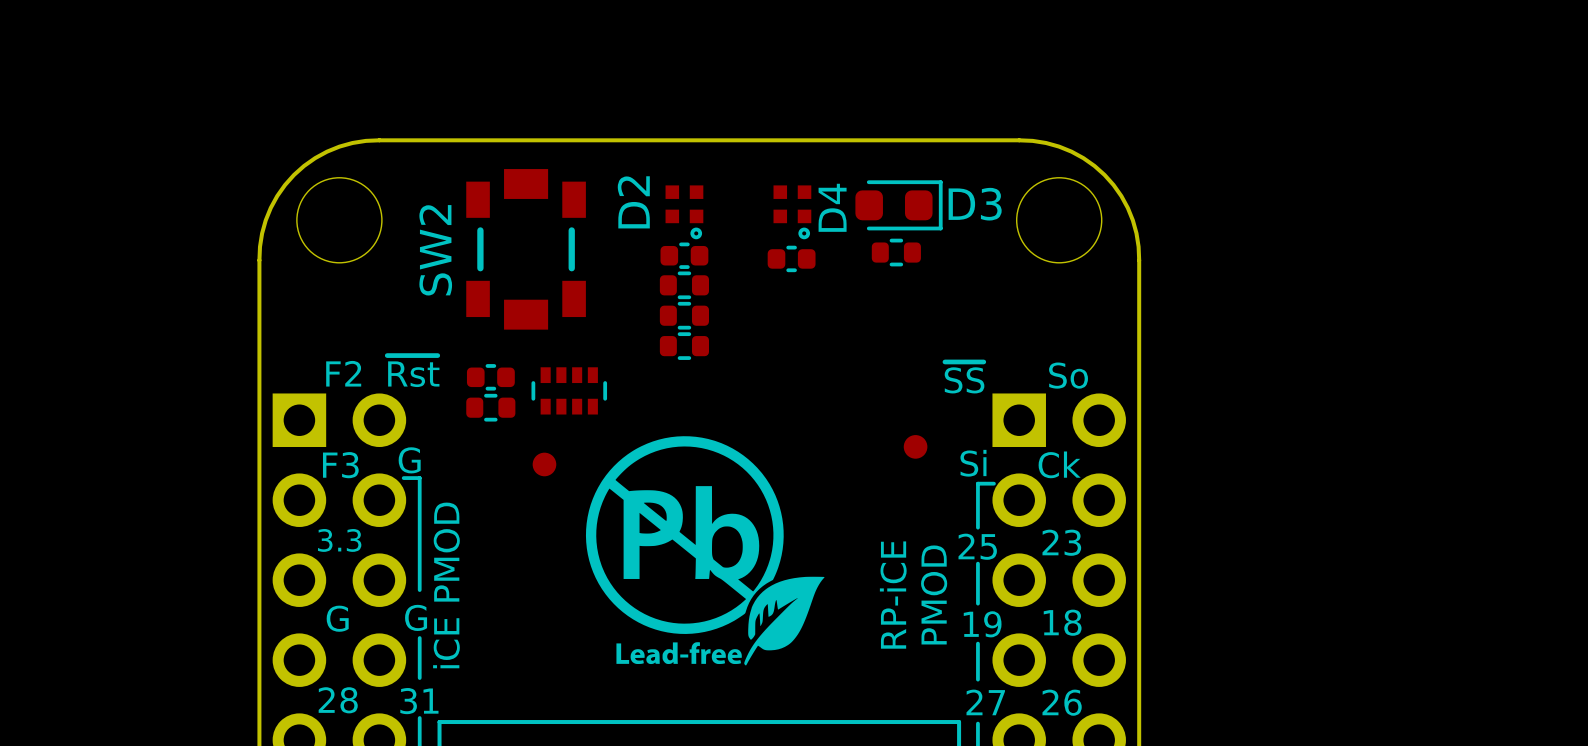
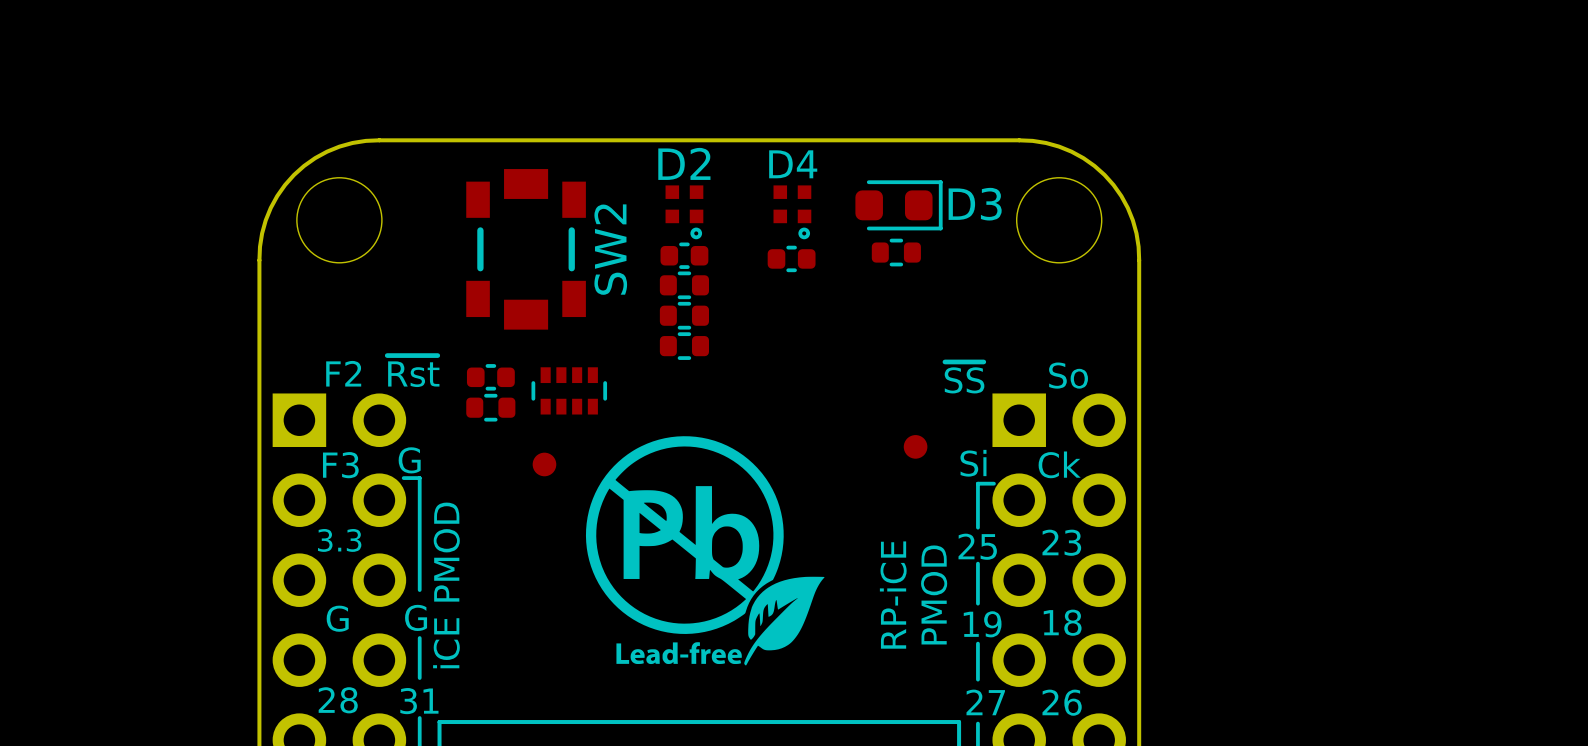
D2 name rotation: 0° (633, 202) -> 90° clockwise (684, 163)
D4 name rotation: 0° (832, 207) -> 90° clockwise (793, 164)
SW2 name position: SW2 (435, 250) -> SW2 (610, 249)

